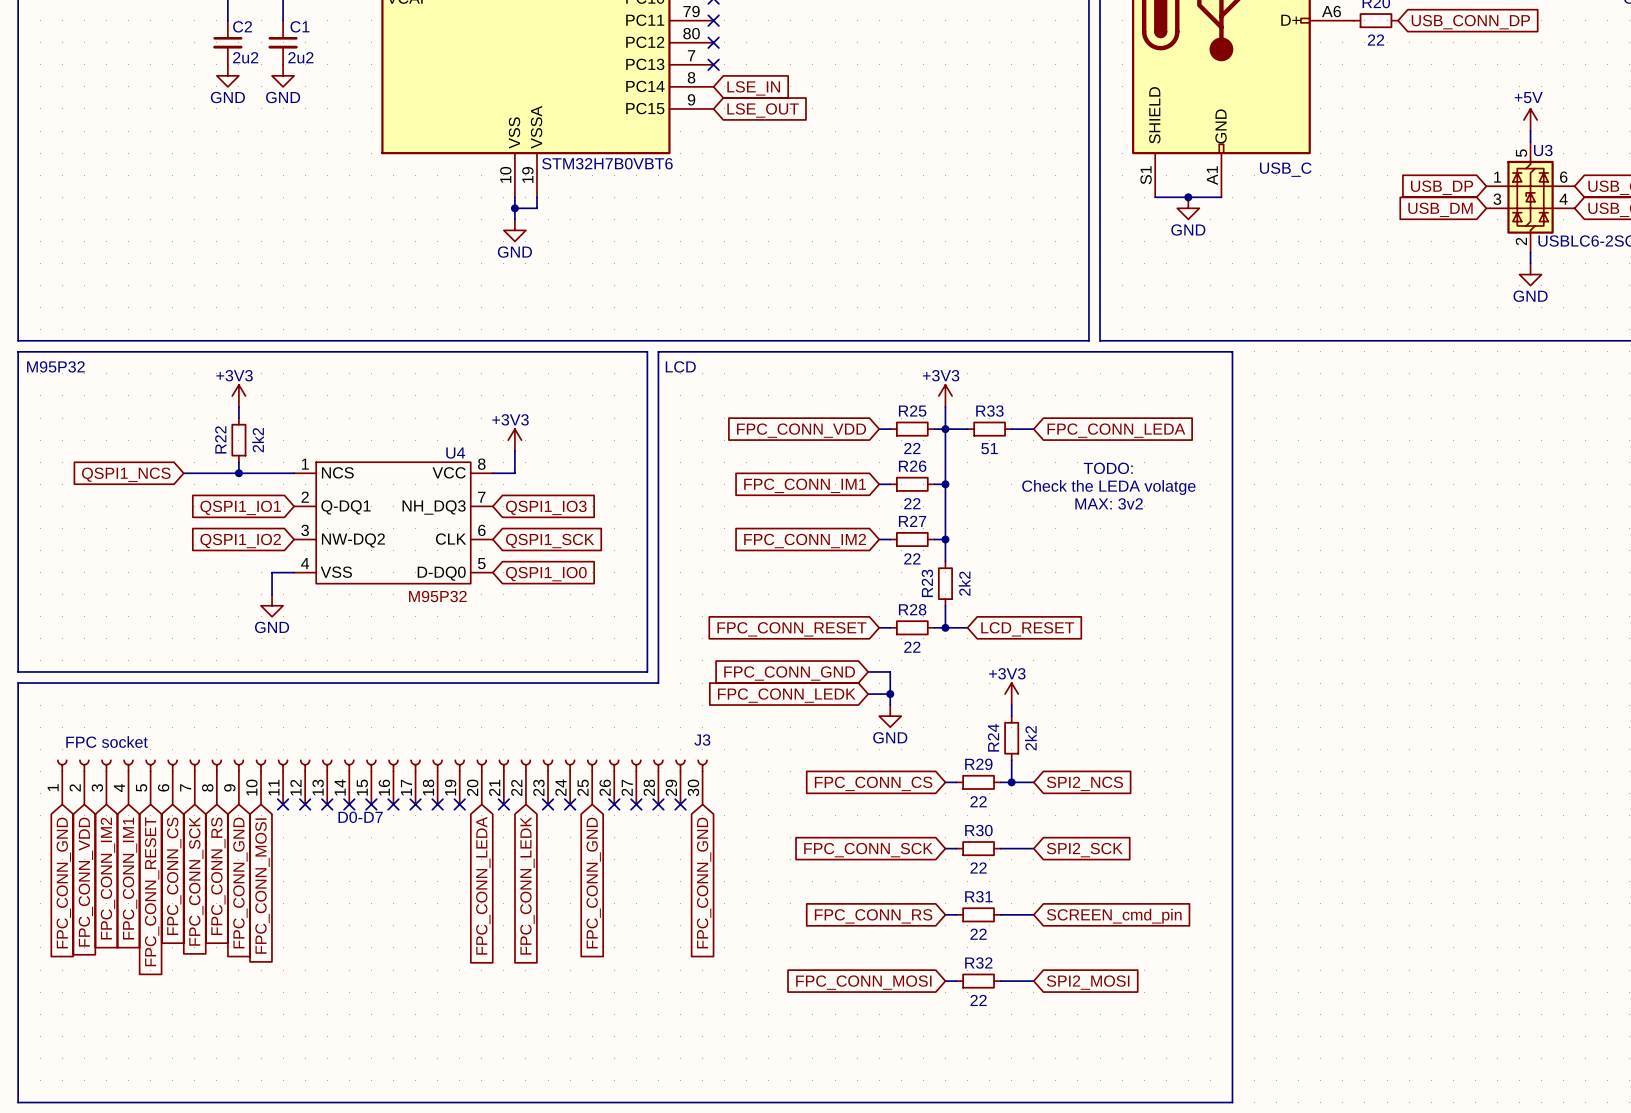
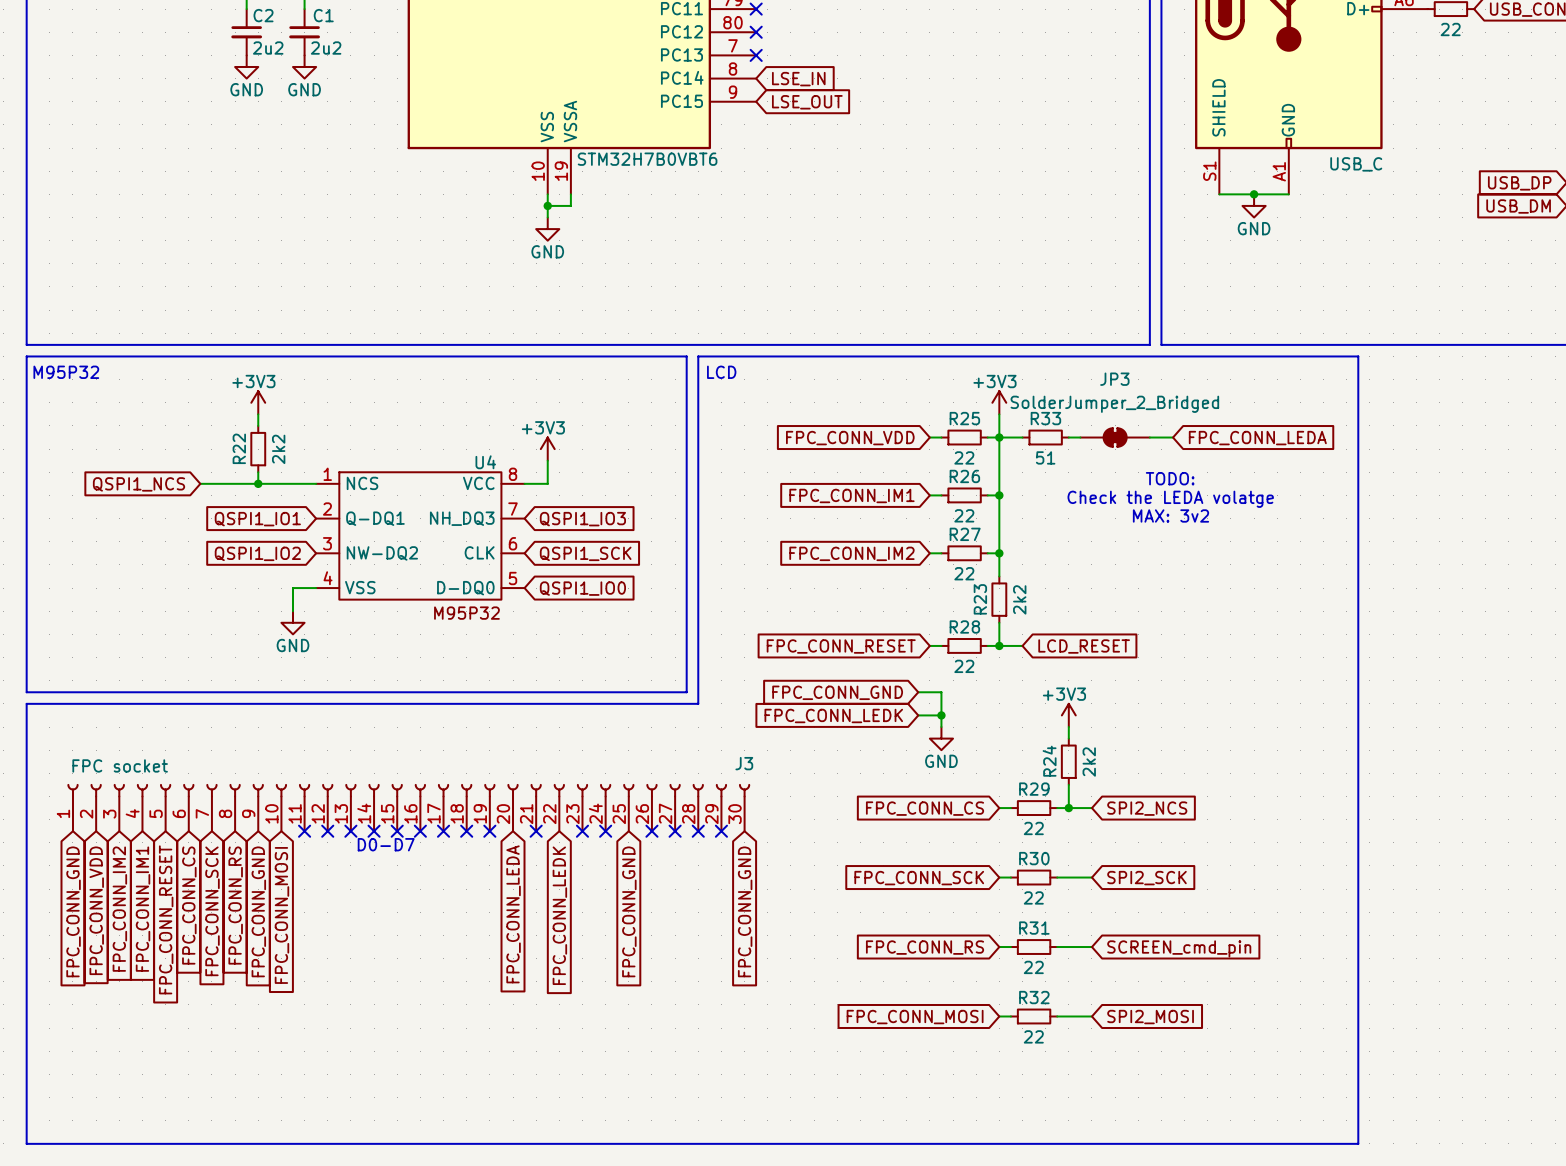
line: (1232, 351) (1232, 1102) -> (1300, 356) (1358, 356) (1358, 1143) (1300, 1143)
JP3: none -> SolderJumper_2_Bridged (1115, 437)
wire: none -> (1149, 437) (1173, 437)
global label position: FPC_CONN_LEDA (1116, 430) -> FPC_CONN_LEDA (1257, 438)

